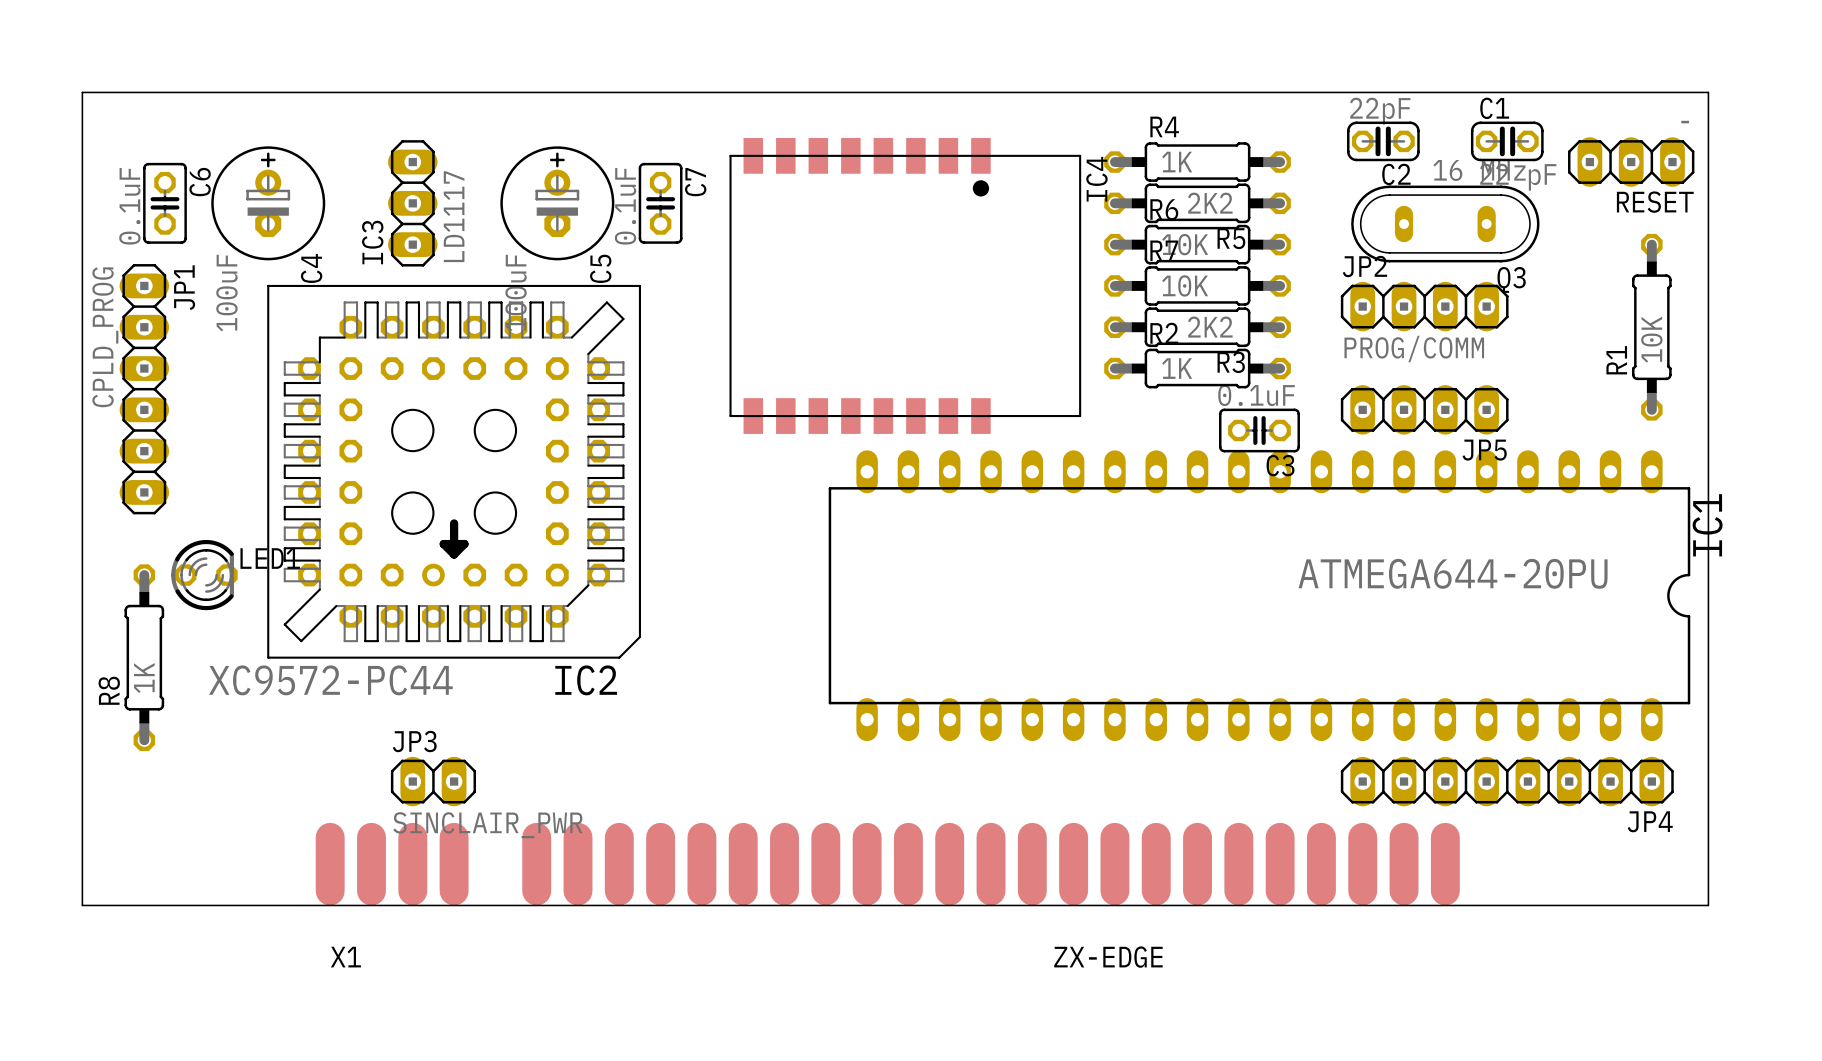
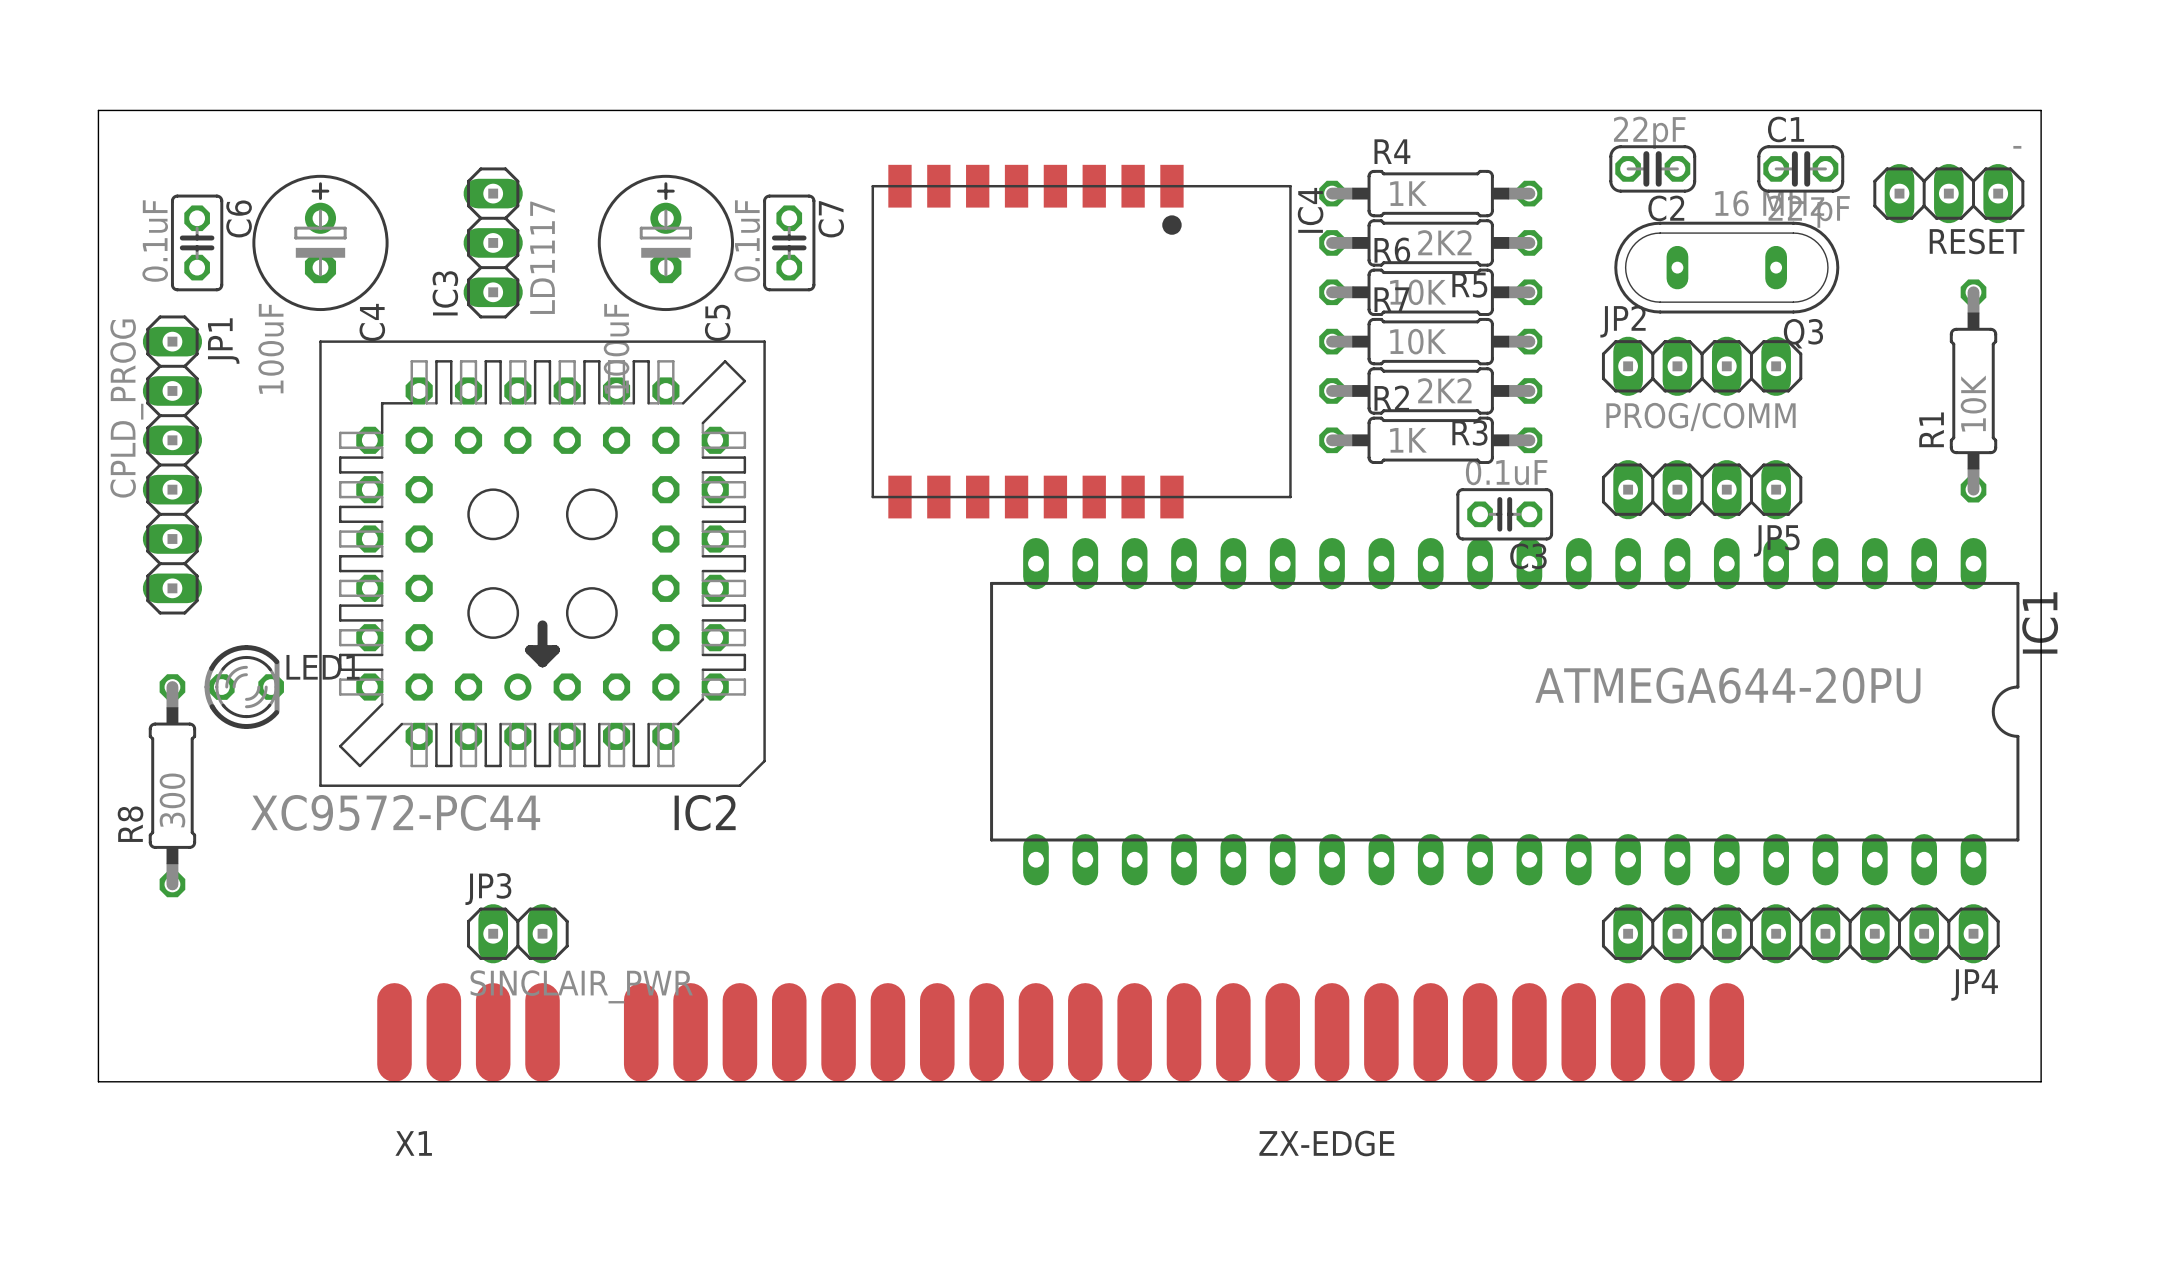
R8 value: 1K (144, 678) -> 300 (172, 800)

